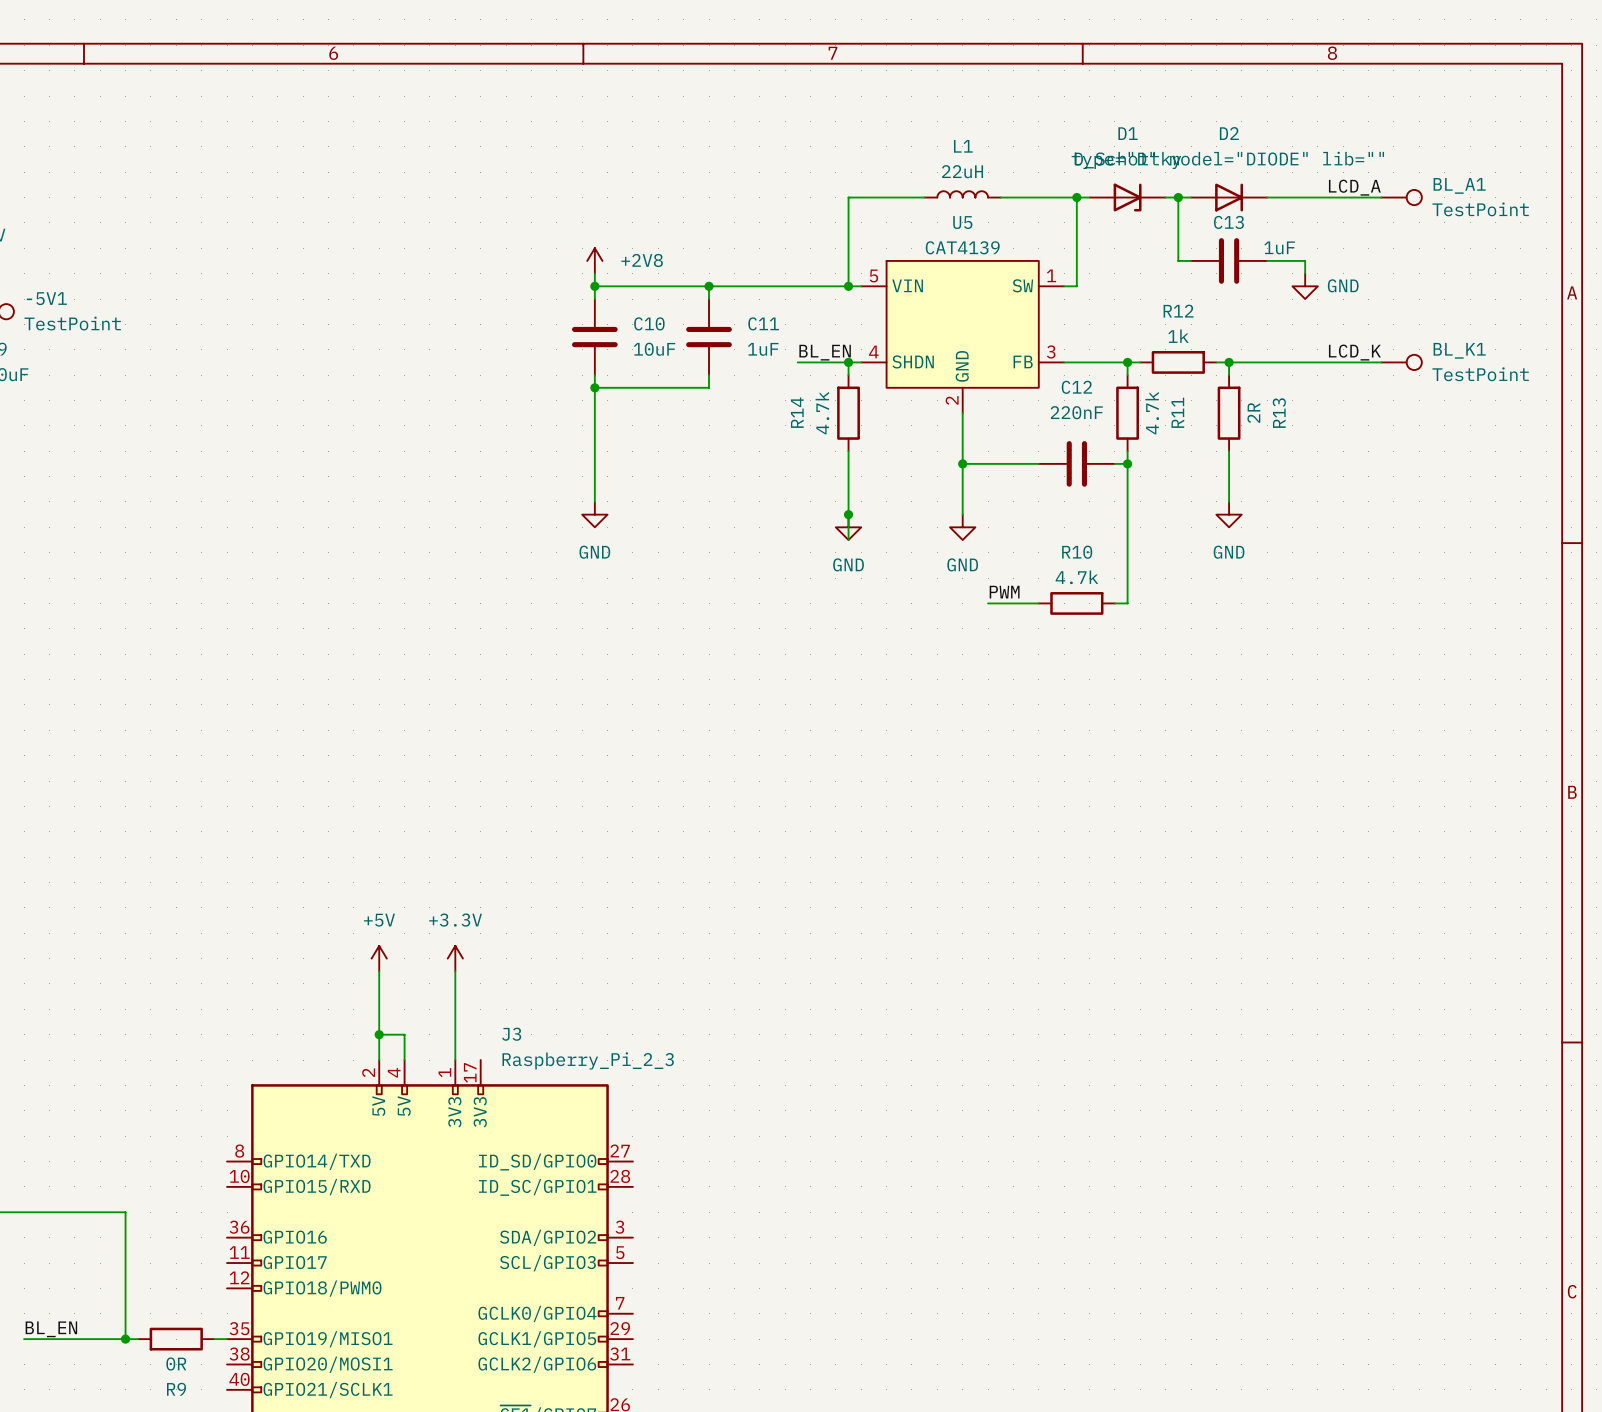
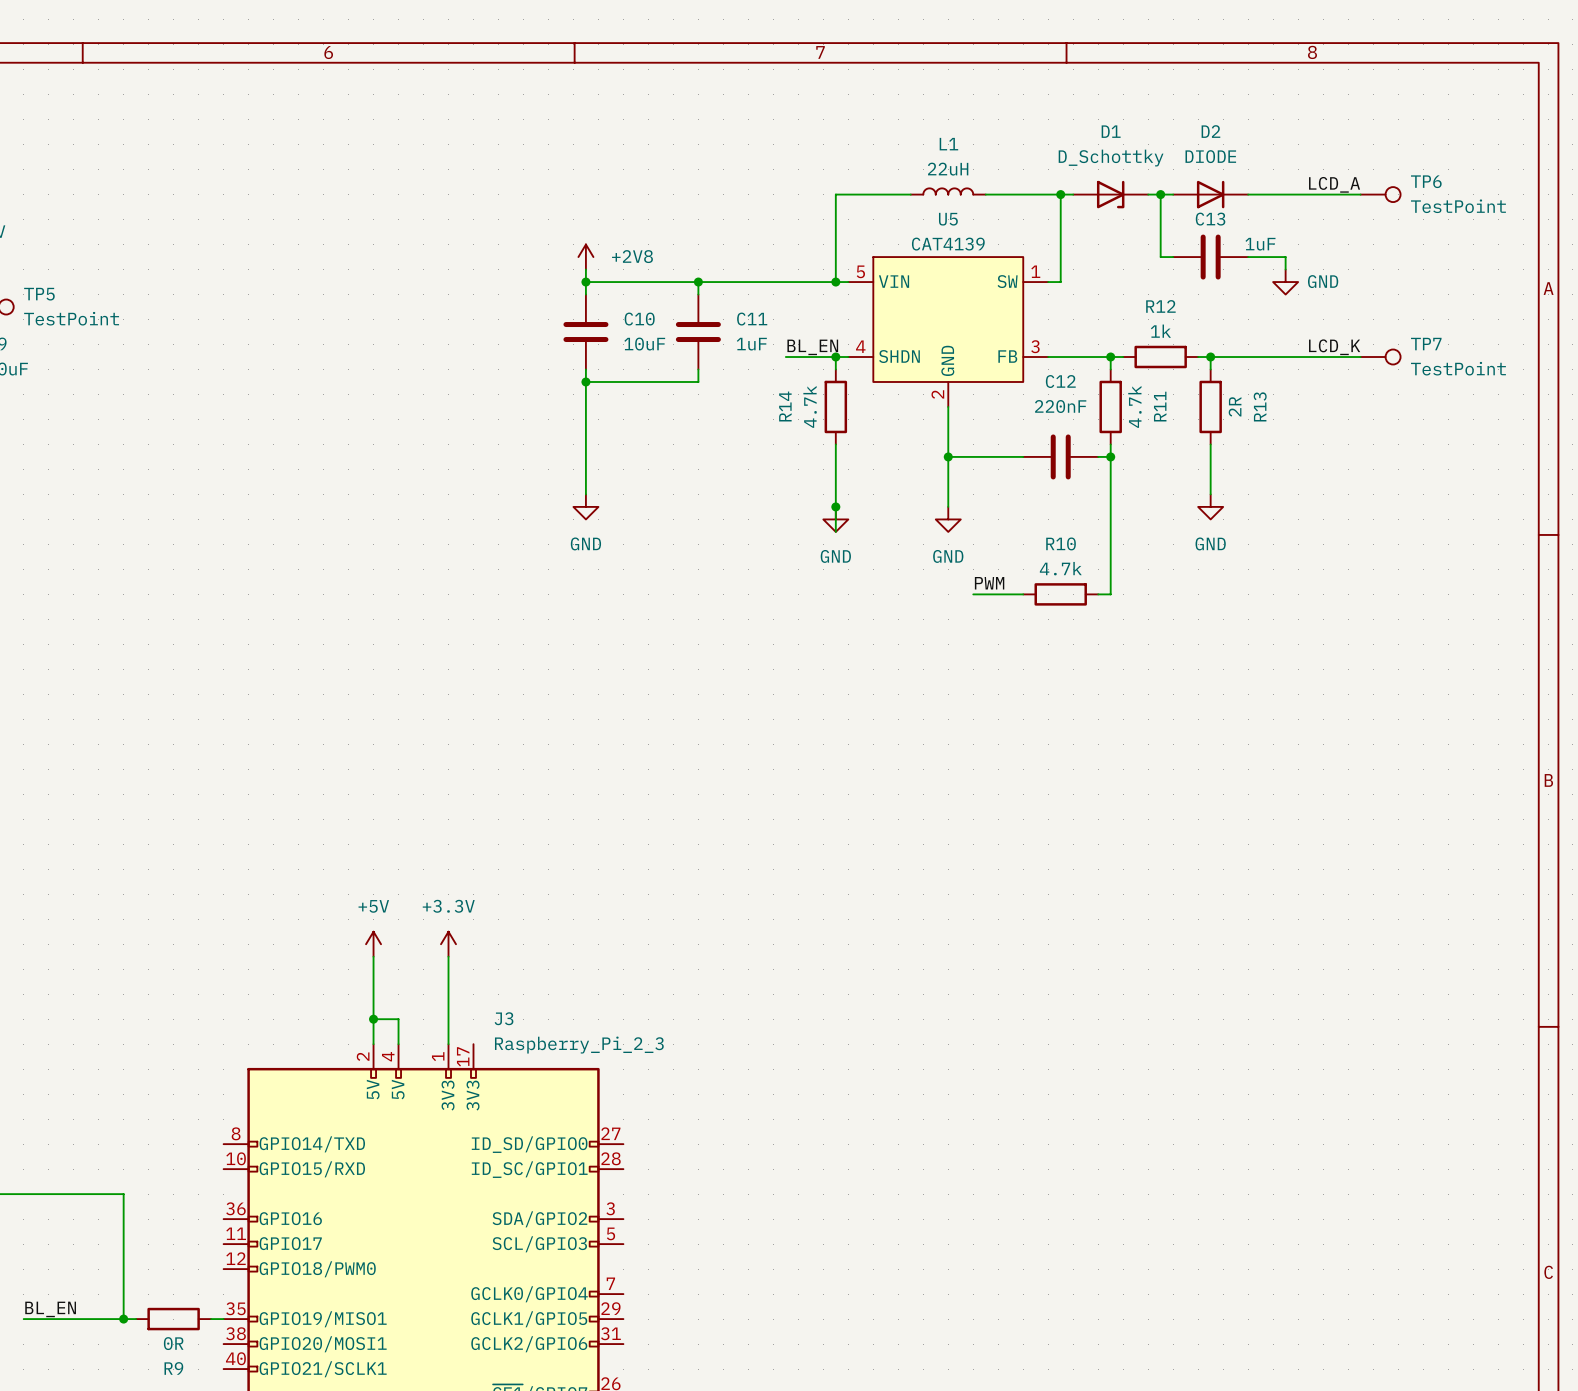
D2 value: type="D" model="DIODE" lib="" (1227, 160) -> DIODE (1210, 156)
BL_A1 name: BL_A1 (1459, 185) -> TP6 (1426, 181)
-5V1 name: -5V1 (46, 298) -> TP5 (39, 294)
BL_K1 name: BL_K1 (1459, 350) -> TP7 (1426, 344)

